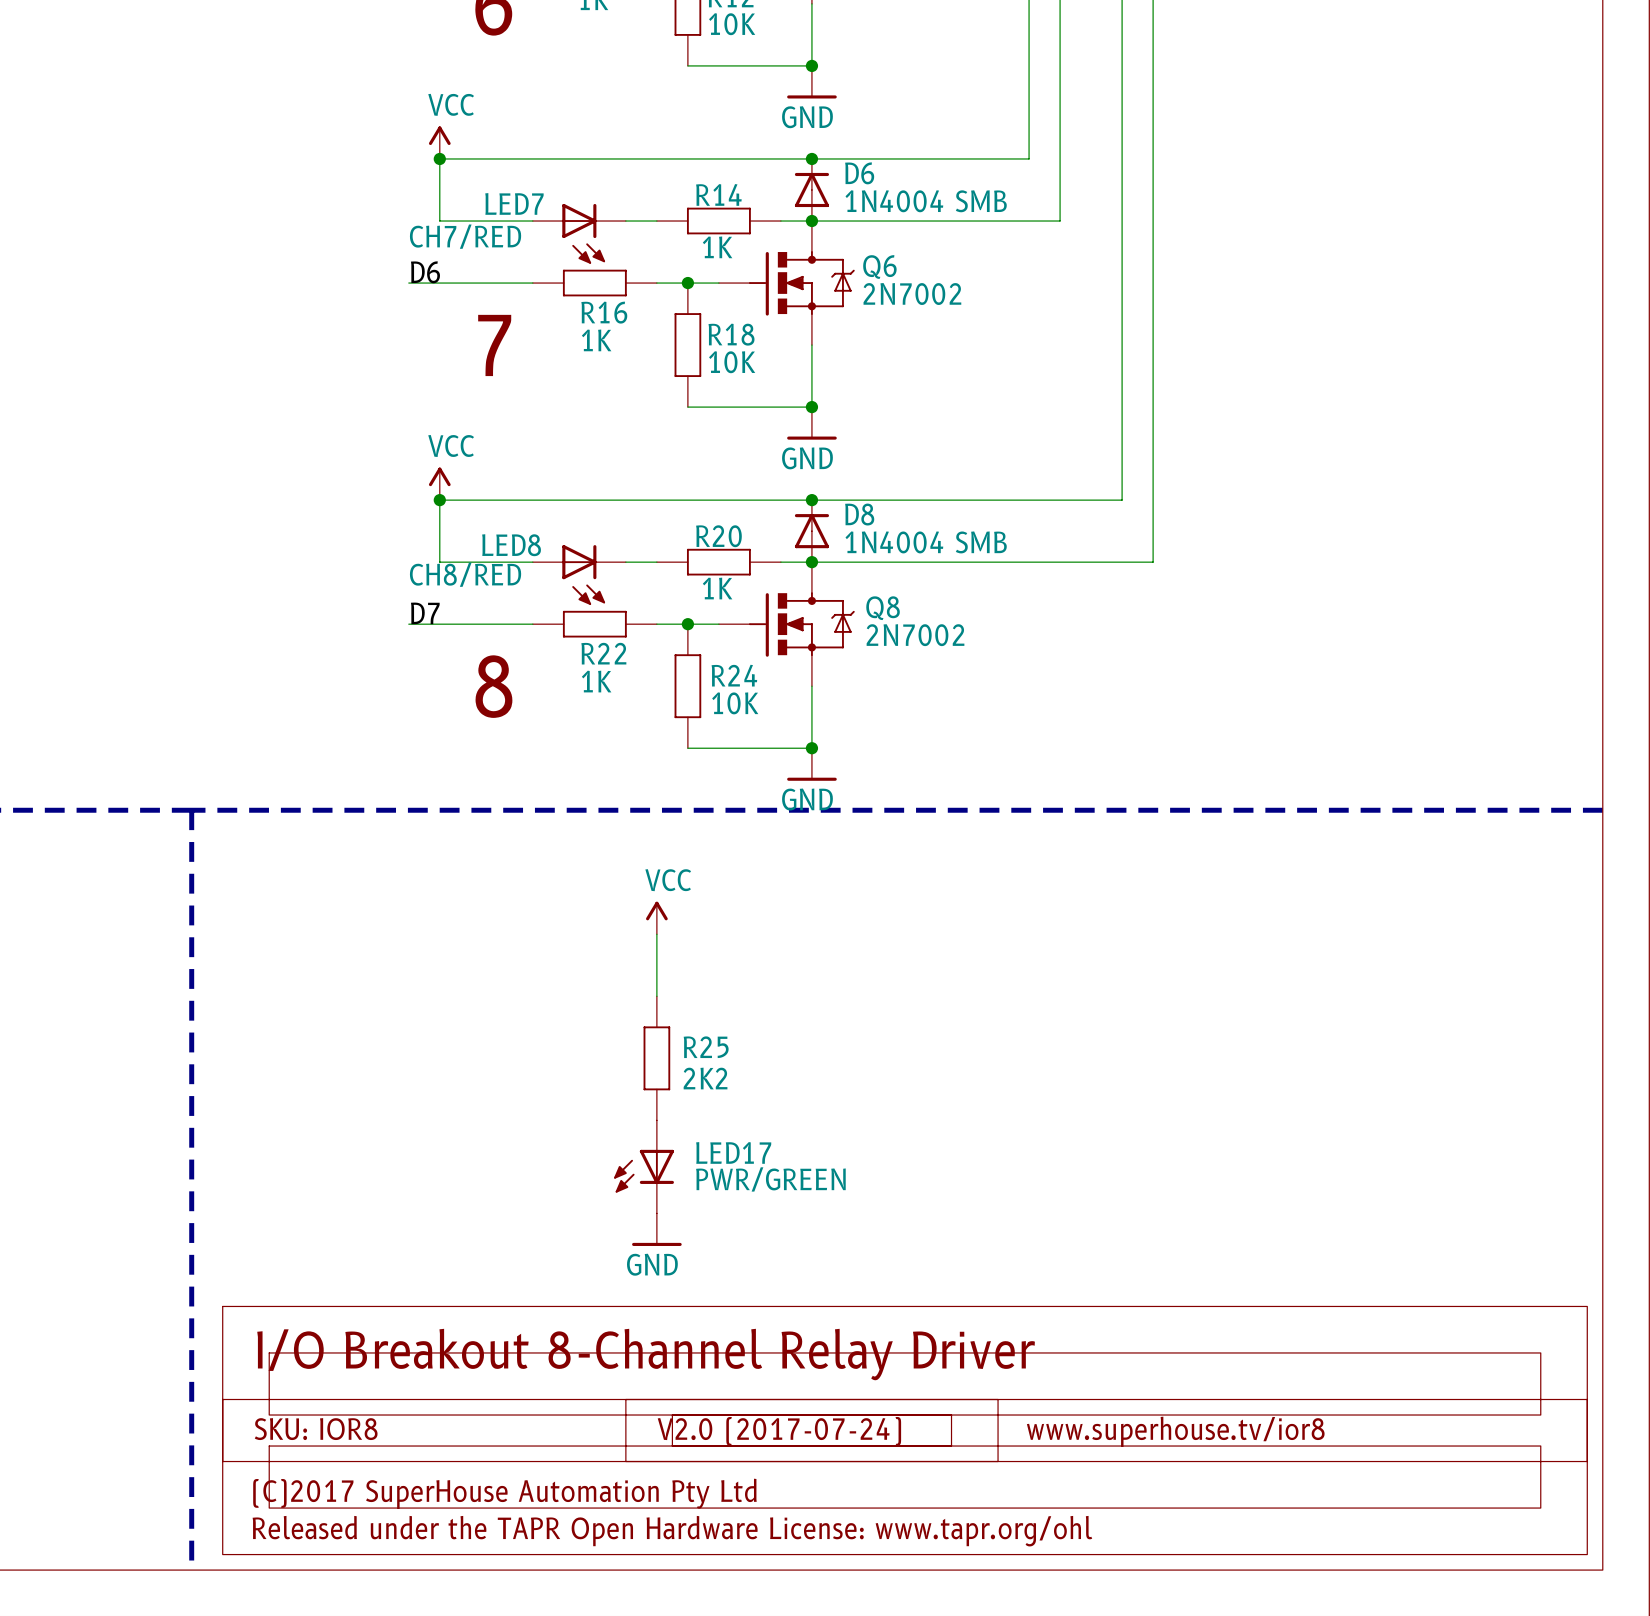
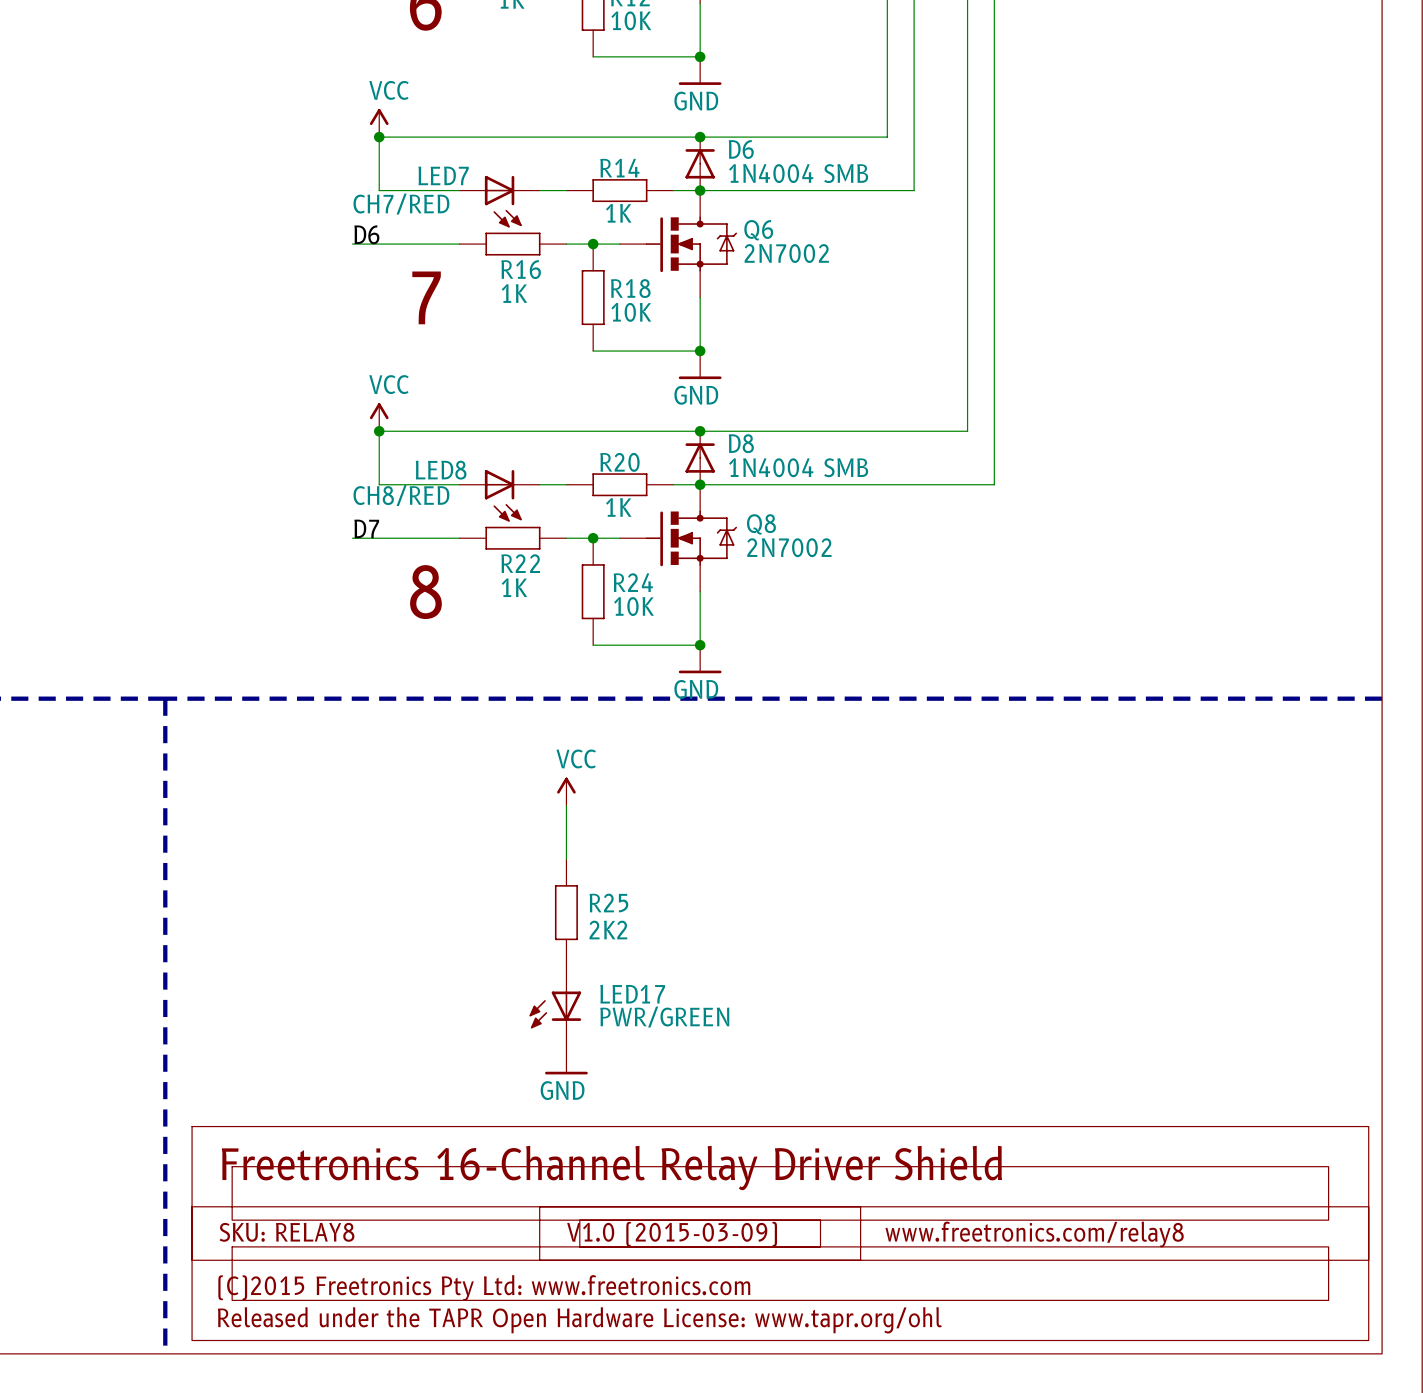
text: I/O Breakout 8-Channel Relay Driver (646, 1354) -> Freetronics 16-Channel Relay Driver Shield (611, 1168)
text: SKU: IOR8 (316, 1429) -> SKU: RELAY8 (287, 1232)
text: V2.0 (2017-07-24) (779, 1431) -> V1.0 (2015-03-09) (672, 1234)
text: www.superhouse.tv/ior8 (1175, 1431) -> www.freetronics.com/relay8 (1034, 1234)
text: (C)2017 SuperHouse Automation Pty Ltd (504, 1493) -> (C)2015 Freetronics Pty Ltd: www.freetronics.com (484, 1288)

